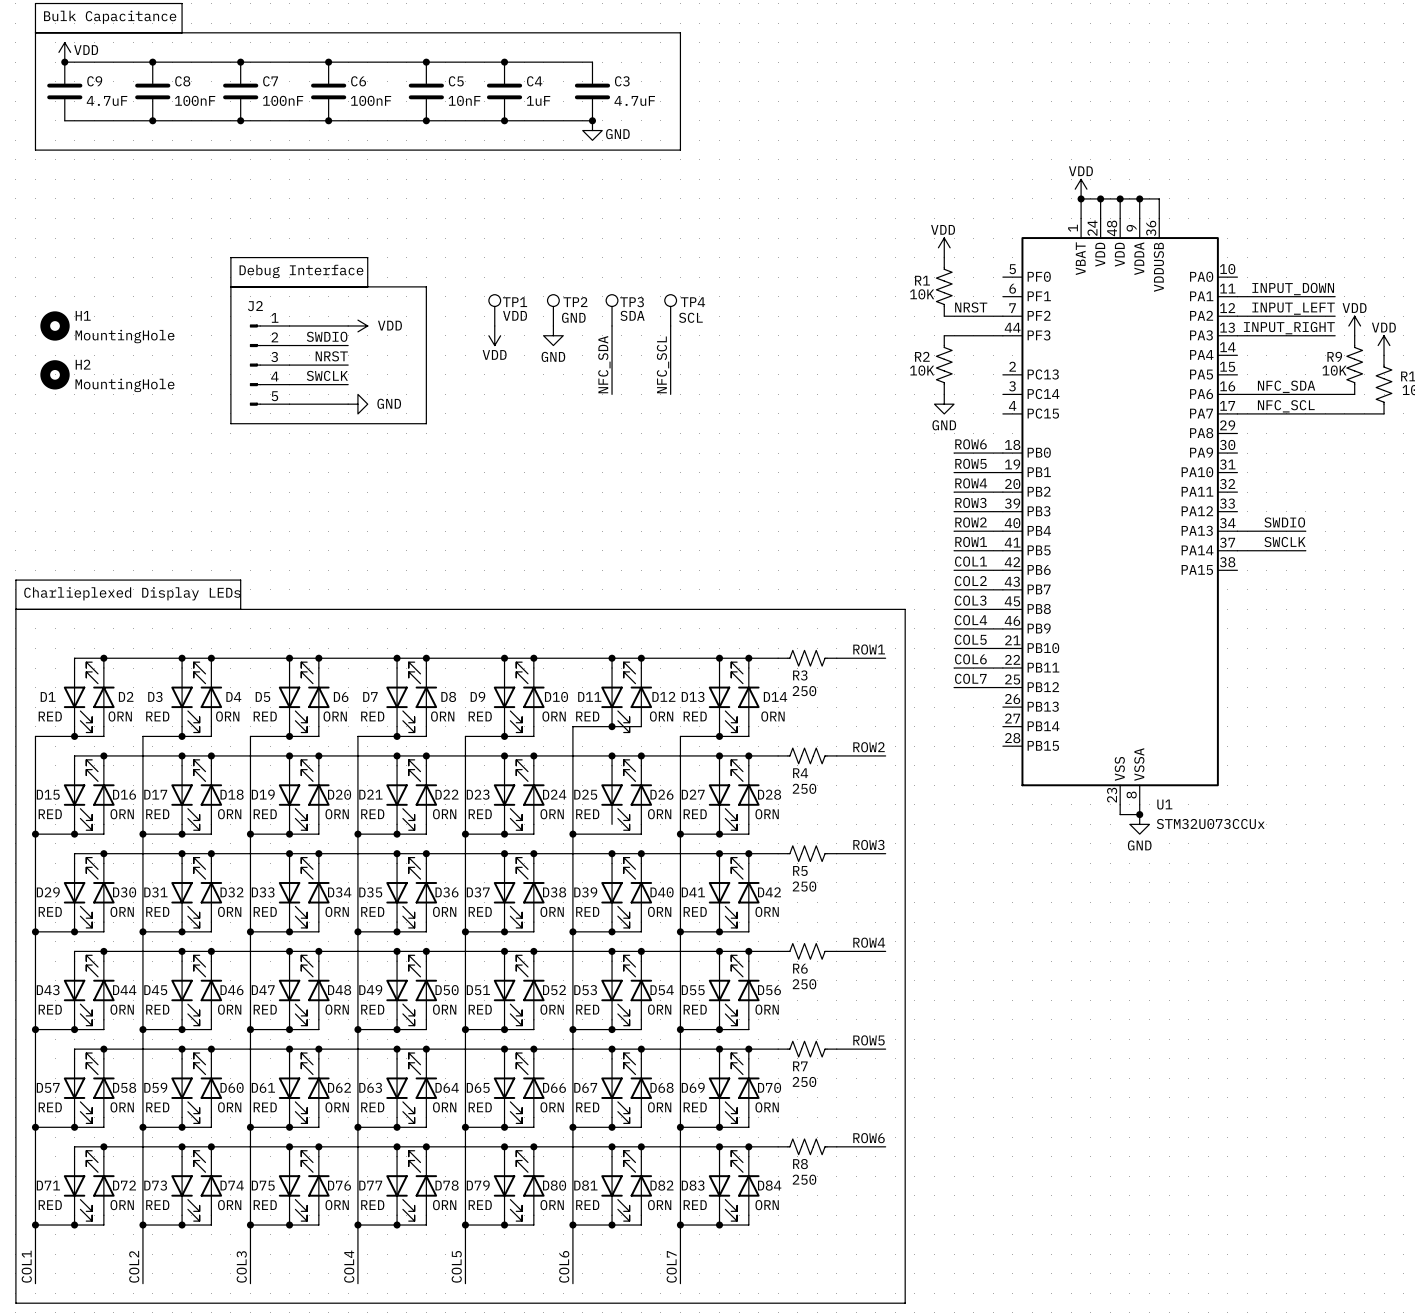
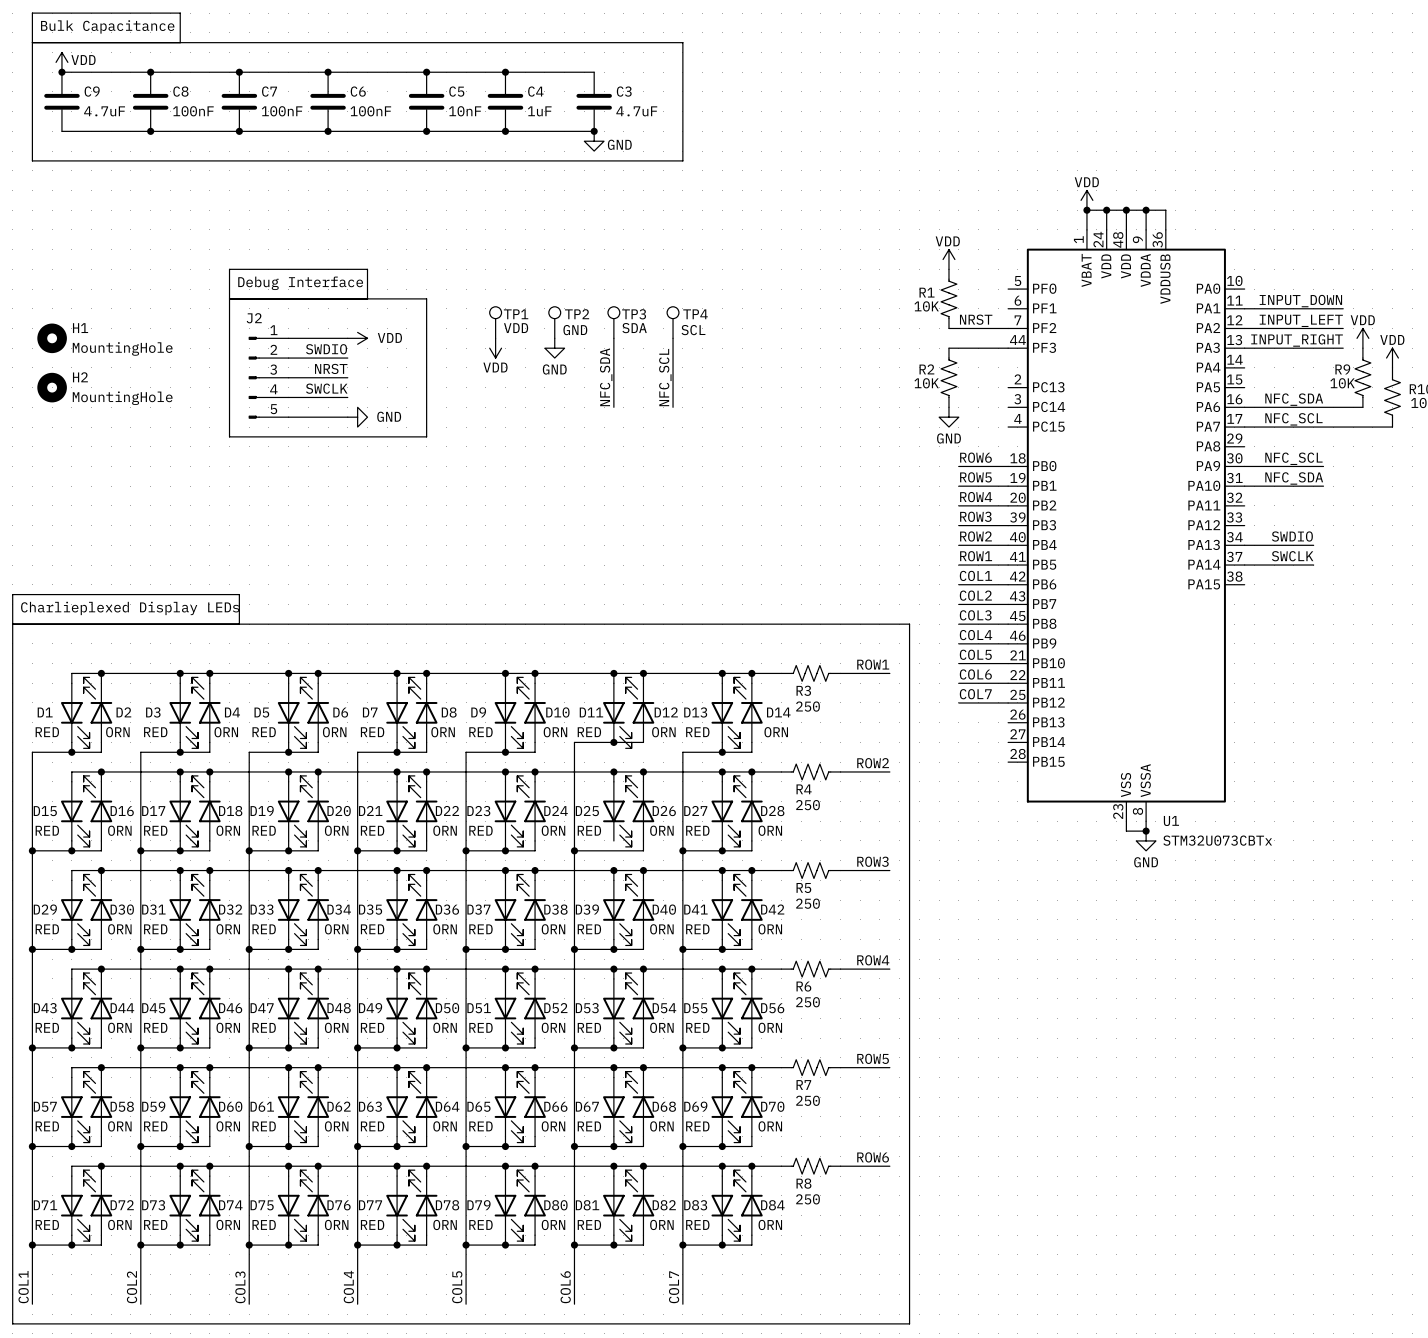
label: none -> NFC_SCL (1293, 458)
wire: none -> (1244, 466) (1323, 466)
label: none -> NFC_SDA (1294, 478)
wire: none -> (1244, 486) (1323, 486)
U1 value: STM32U073CCUx (1210, 823) -> STM32U073CBTx (1217, 840)

